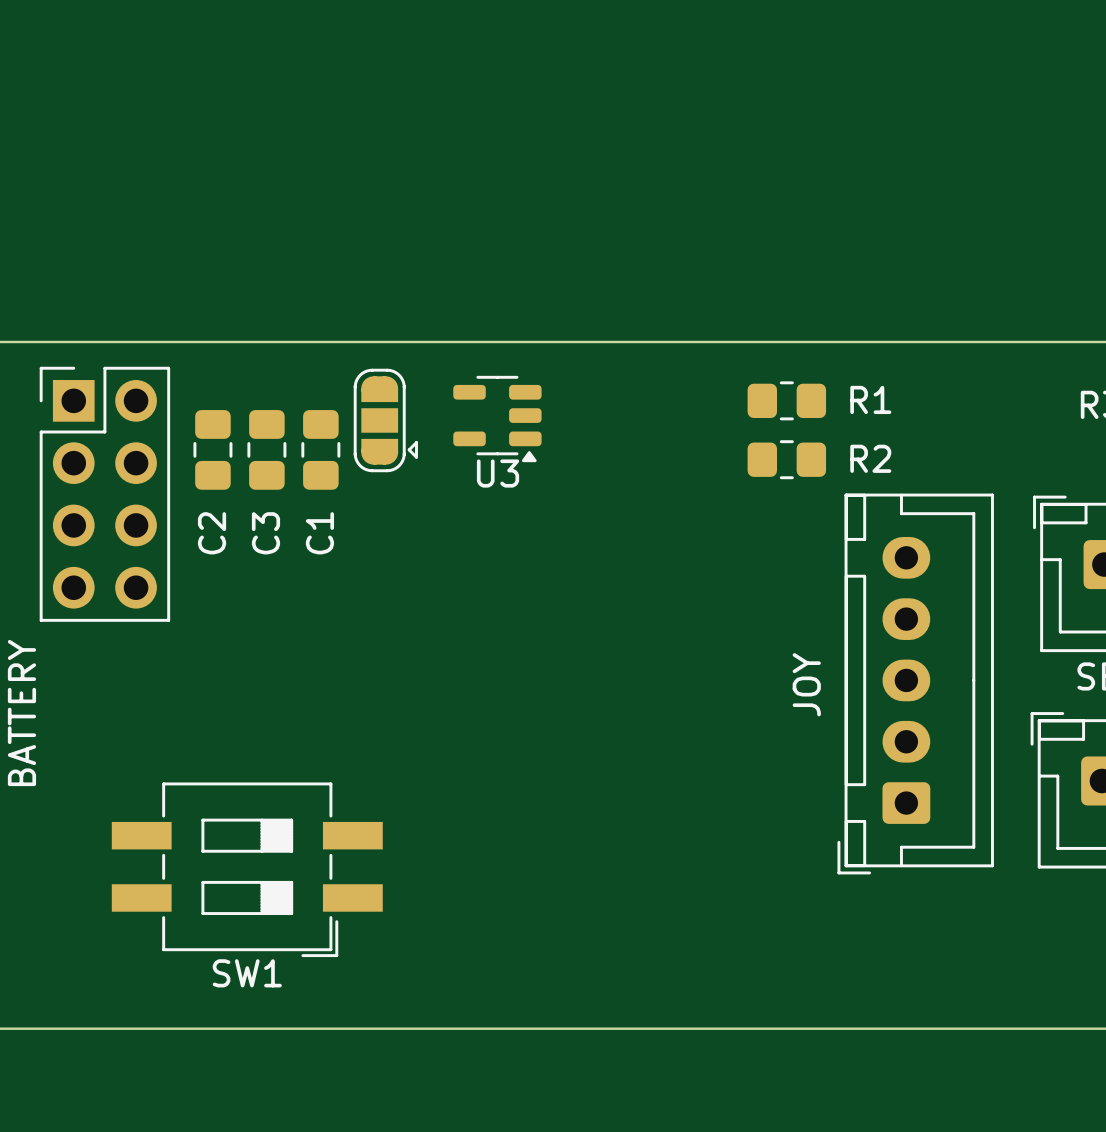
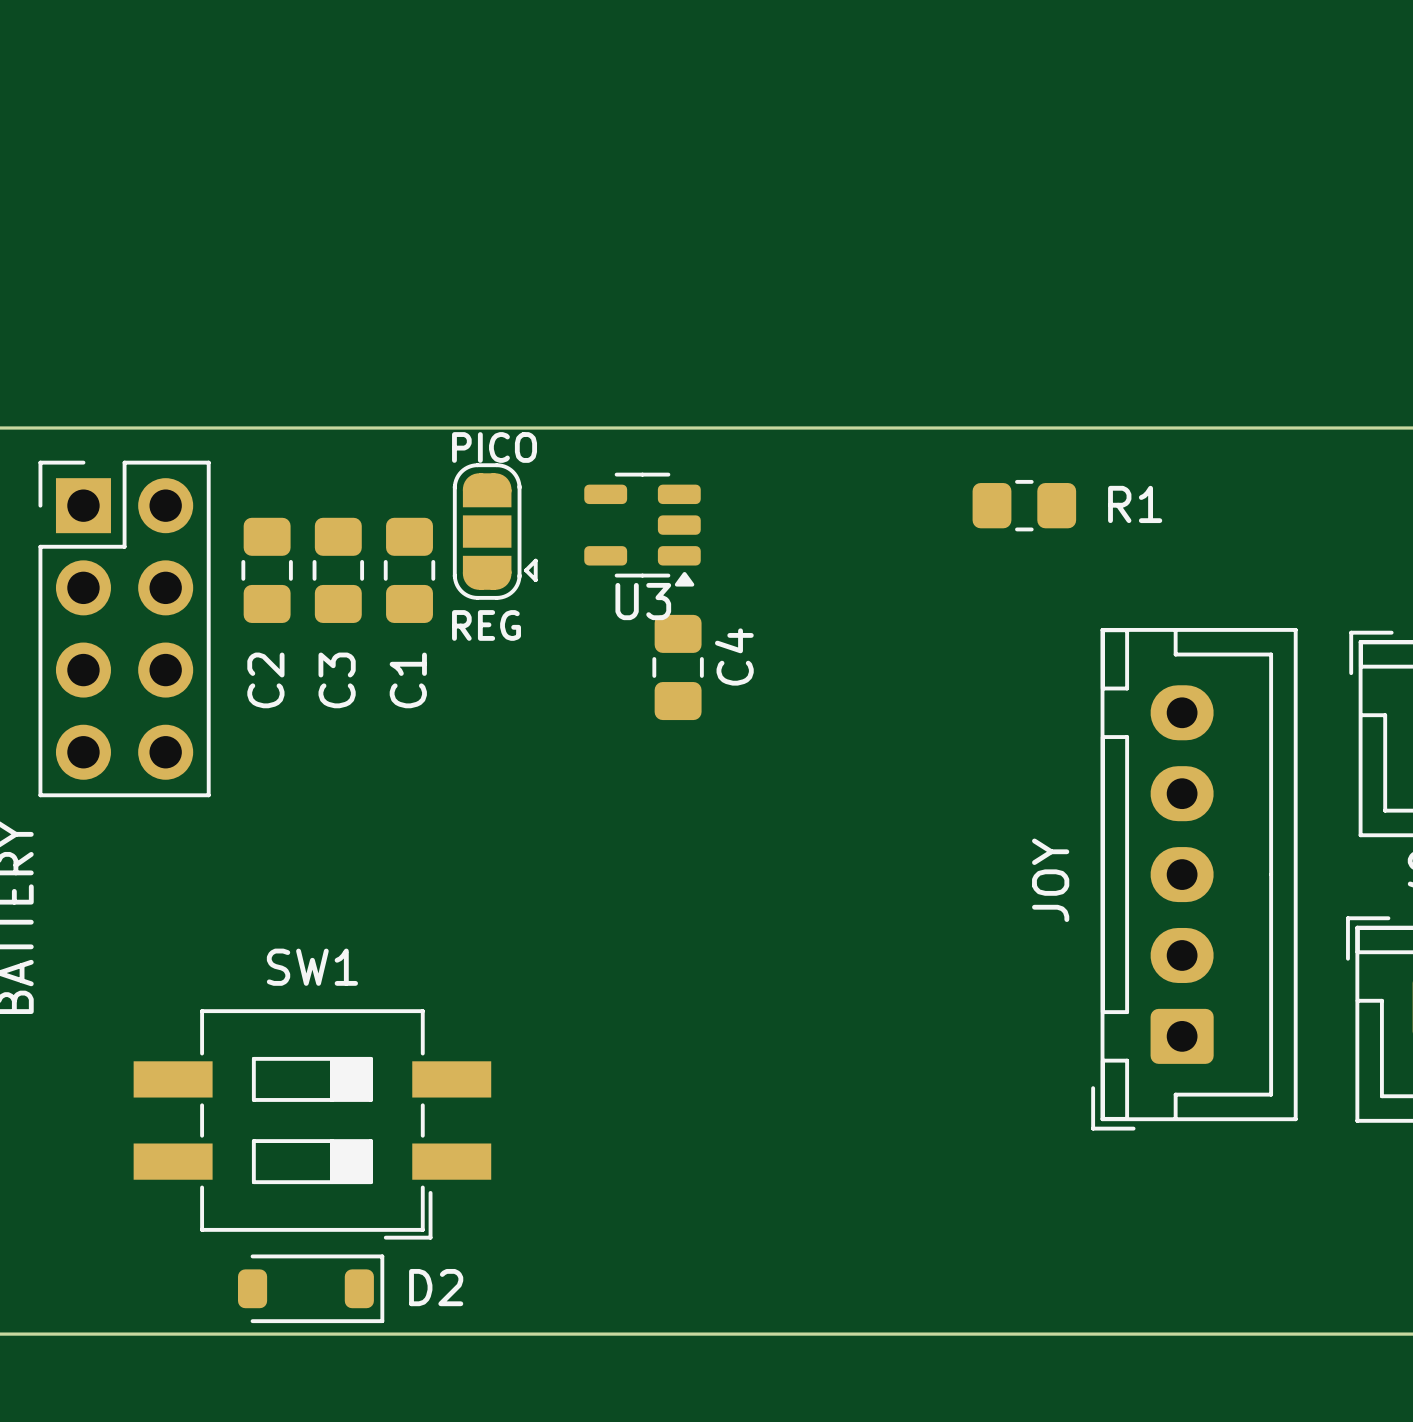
text: none -> PICO (494, 447)
R2: (786, 459) -> none
text: none -> REG (486, 625)
C4: none -> (678, 667)
SW1 name position: SW1 (247, 973) -> SW1 (312, 967)
D2: none -> (311, 1288)

